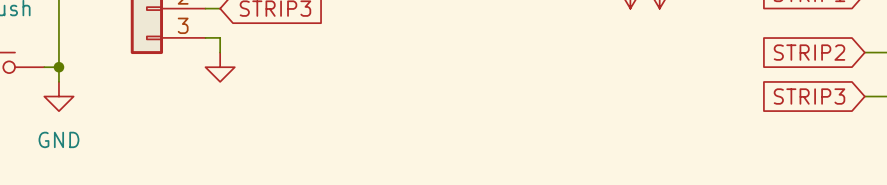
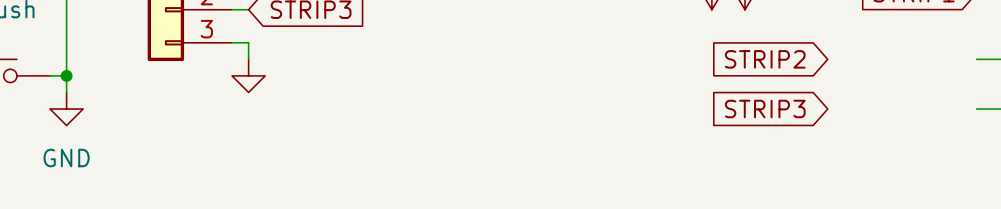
global label position: STRIP2 (809, 52) -> STRIP2 (765, 59)
global label position: STRIP3 (809, 96) -> STRIP3 (765, 109)

